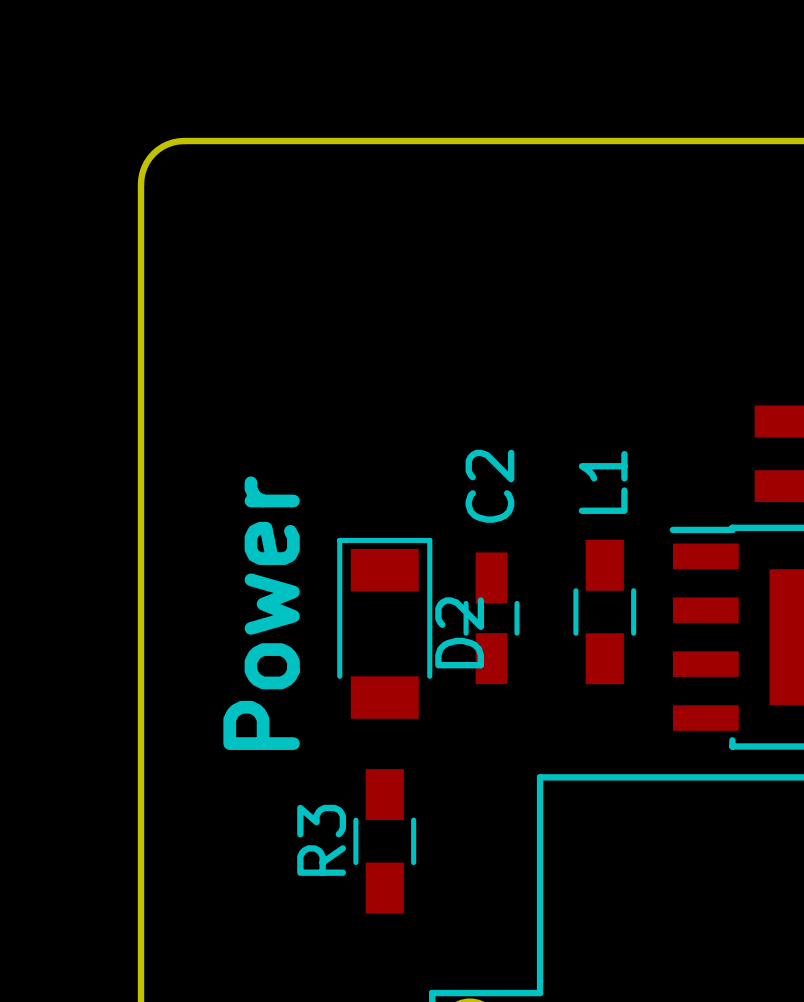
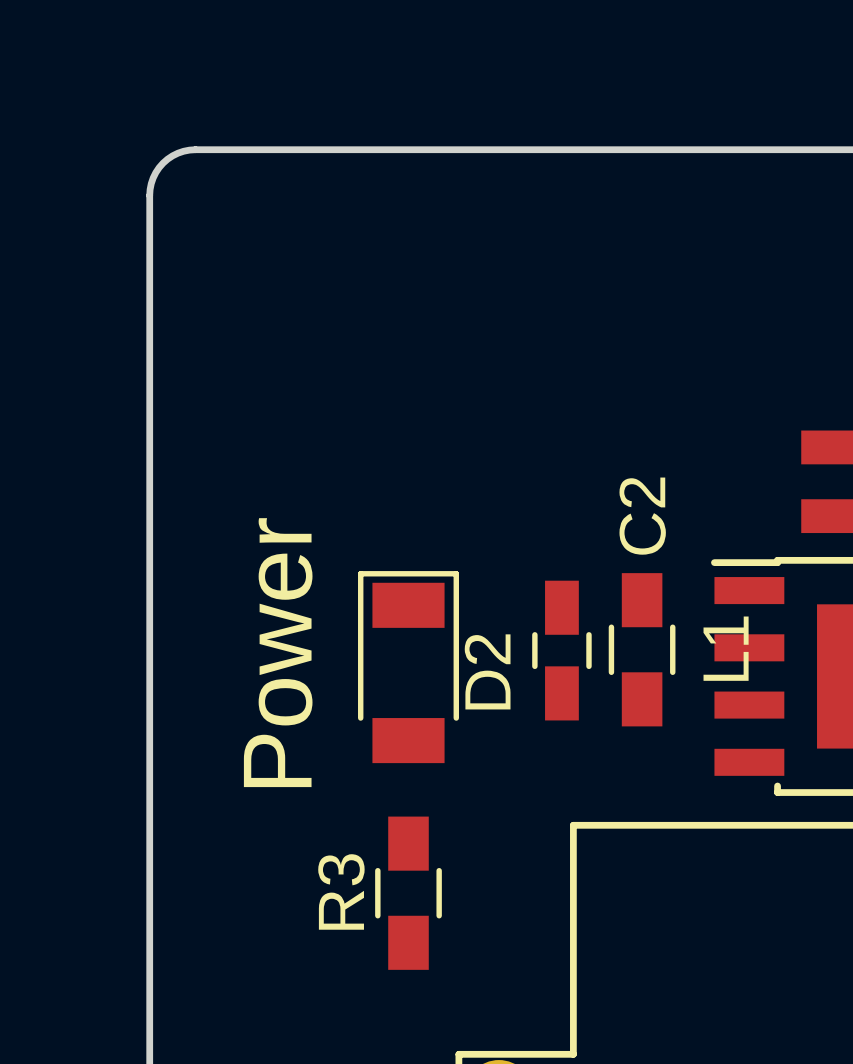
L1 name position: L1 (603, 482) -> L1 (726, 648)
C2 name position: C2 (489, 486) -> C2 (642, 516)
C2 position: (491, 618) -> (561, 650)

